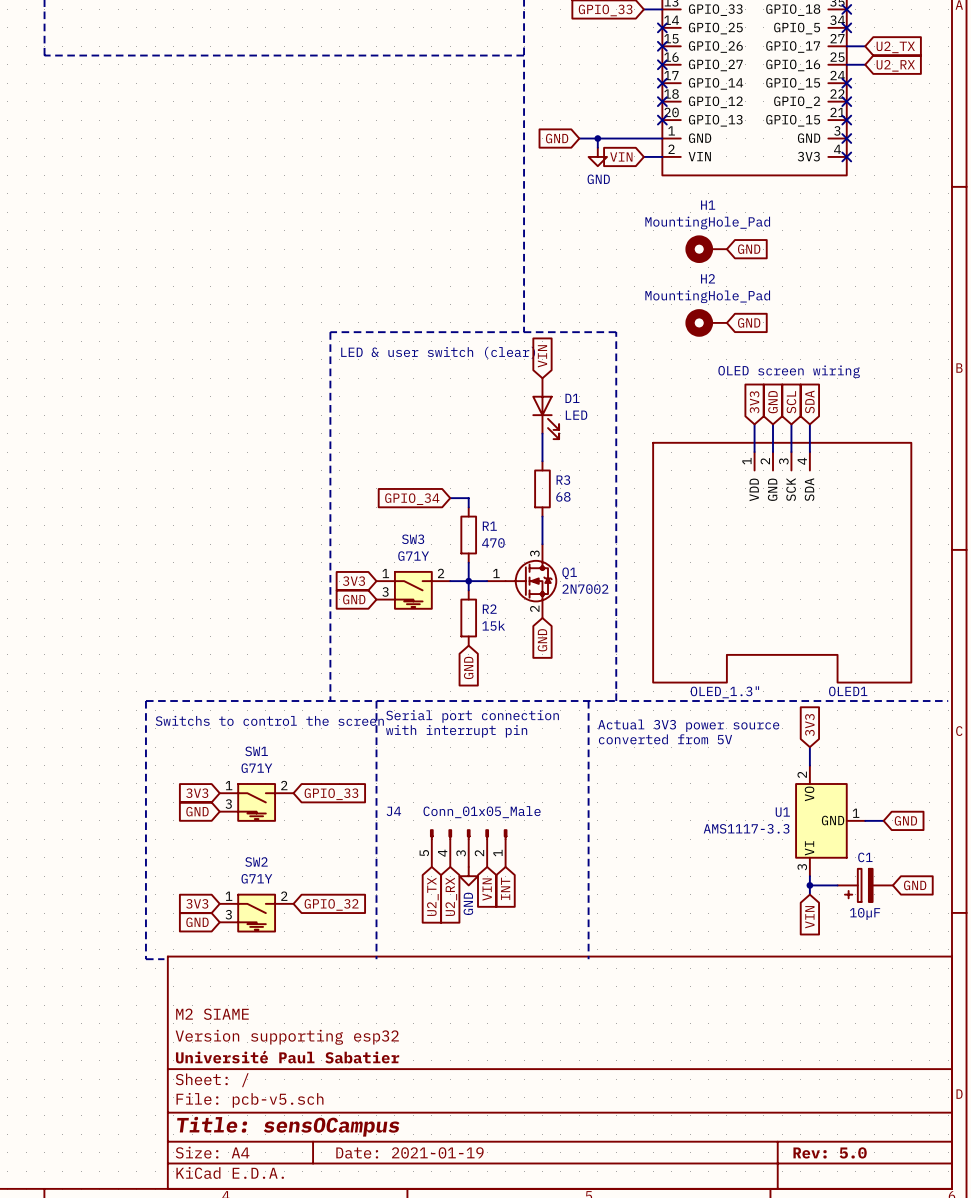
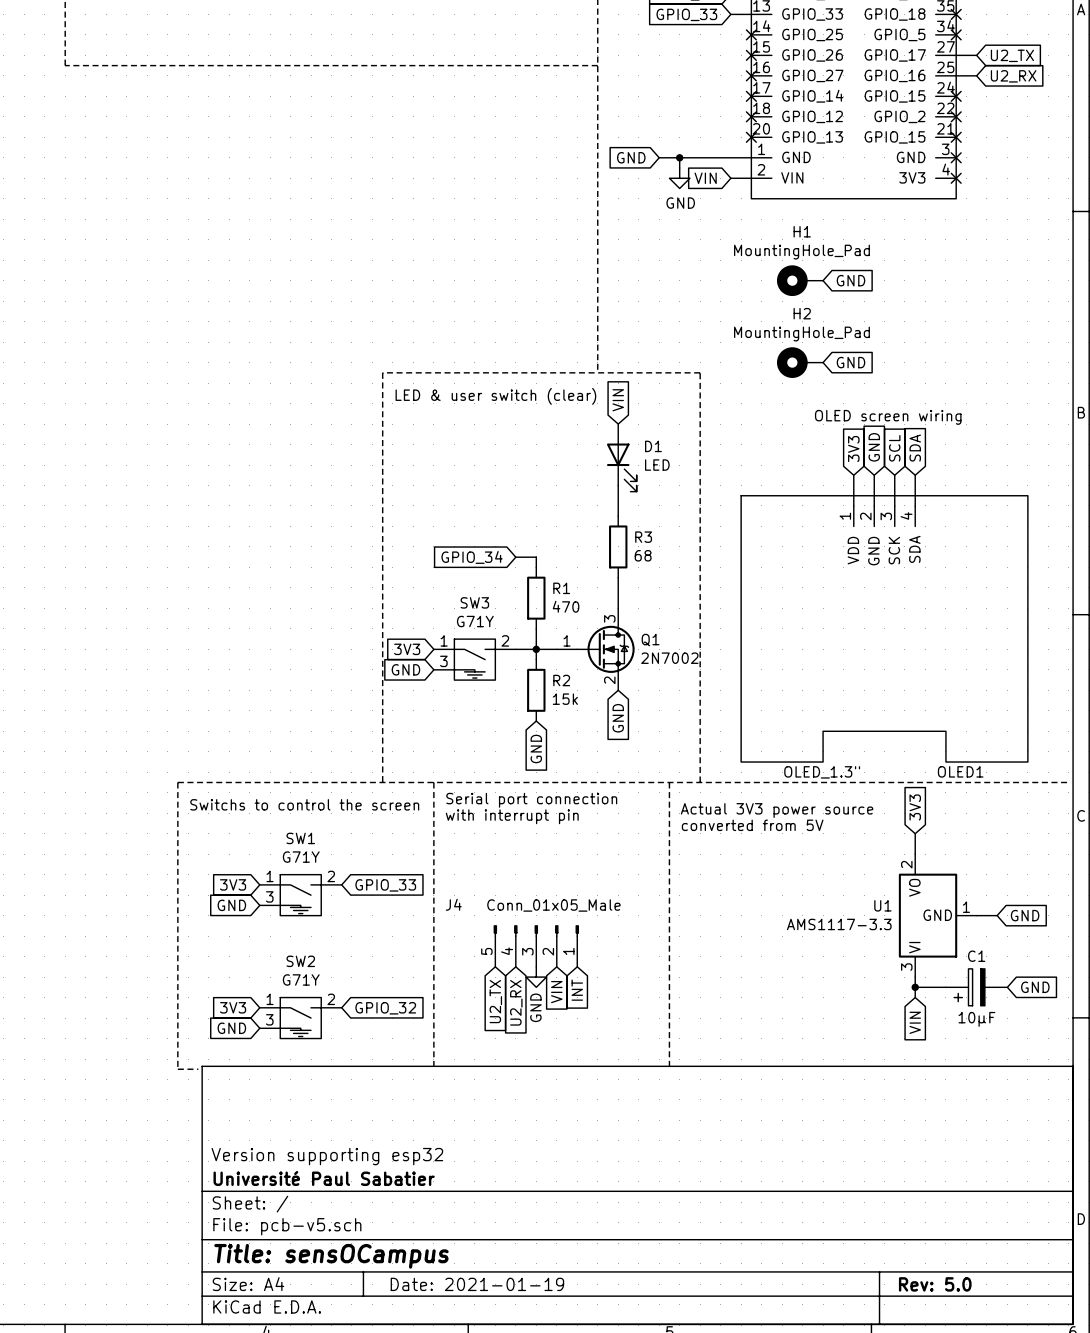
title block: M2 SIAME (212, 1014) -> none

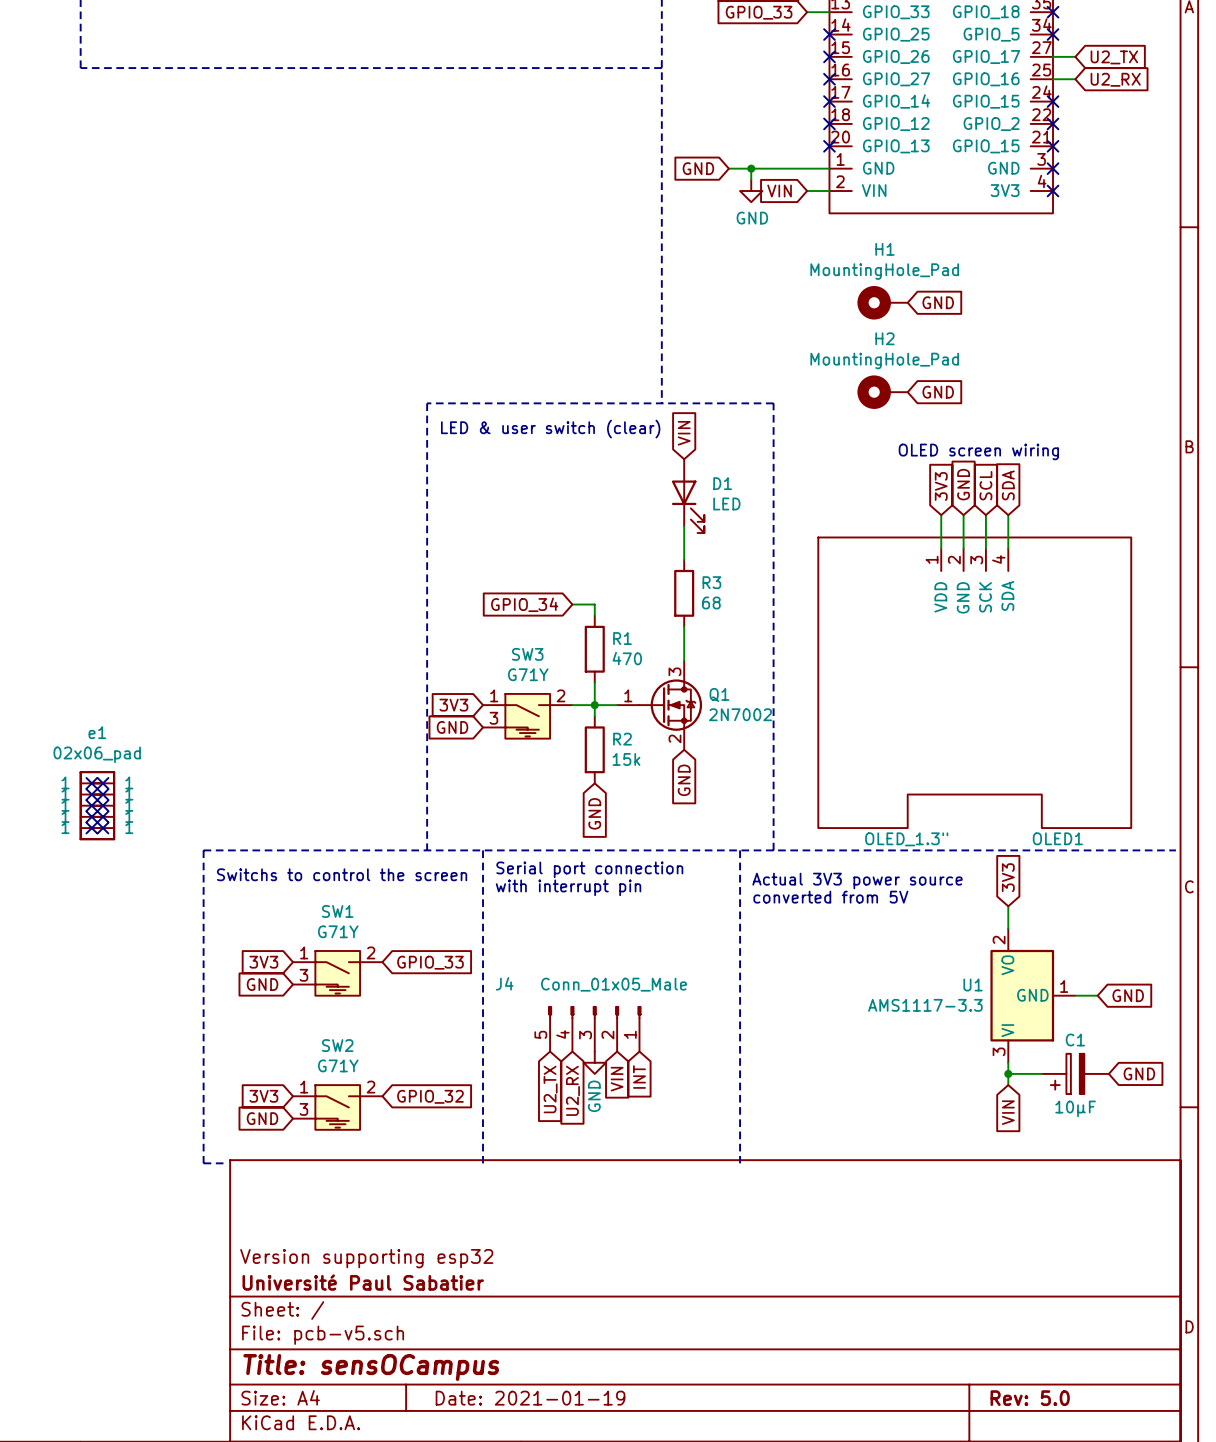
no-connect mark: none -> (91, 783)
no-connect mark: none -> (103, 783)
no-connect mark: none -> (91, 794)
no-connect mark: none -> (103, 794)
no-connect mark: none -> (91, 805)
e1: none -> 02x06_pad (97, 805)
no-connect mark: none -> (103, 805)
no-connect mark: none -> (91, 816)
no-connect mark: none -> (103, 816)
no-connect mark: none -> (91, 828)
no-connect mark: none -> (103, 828)

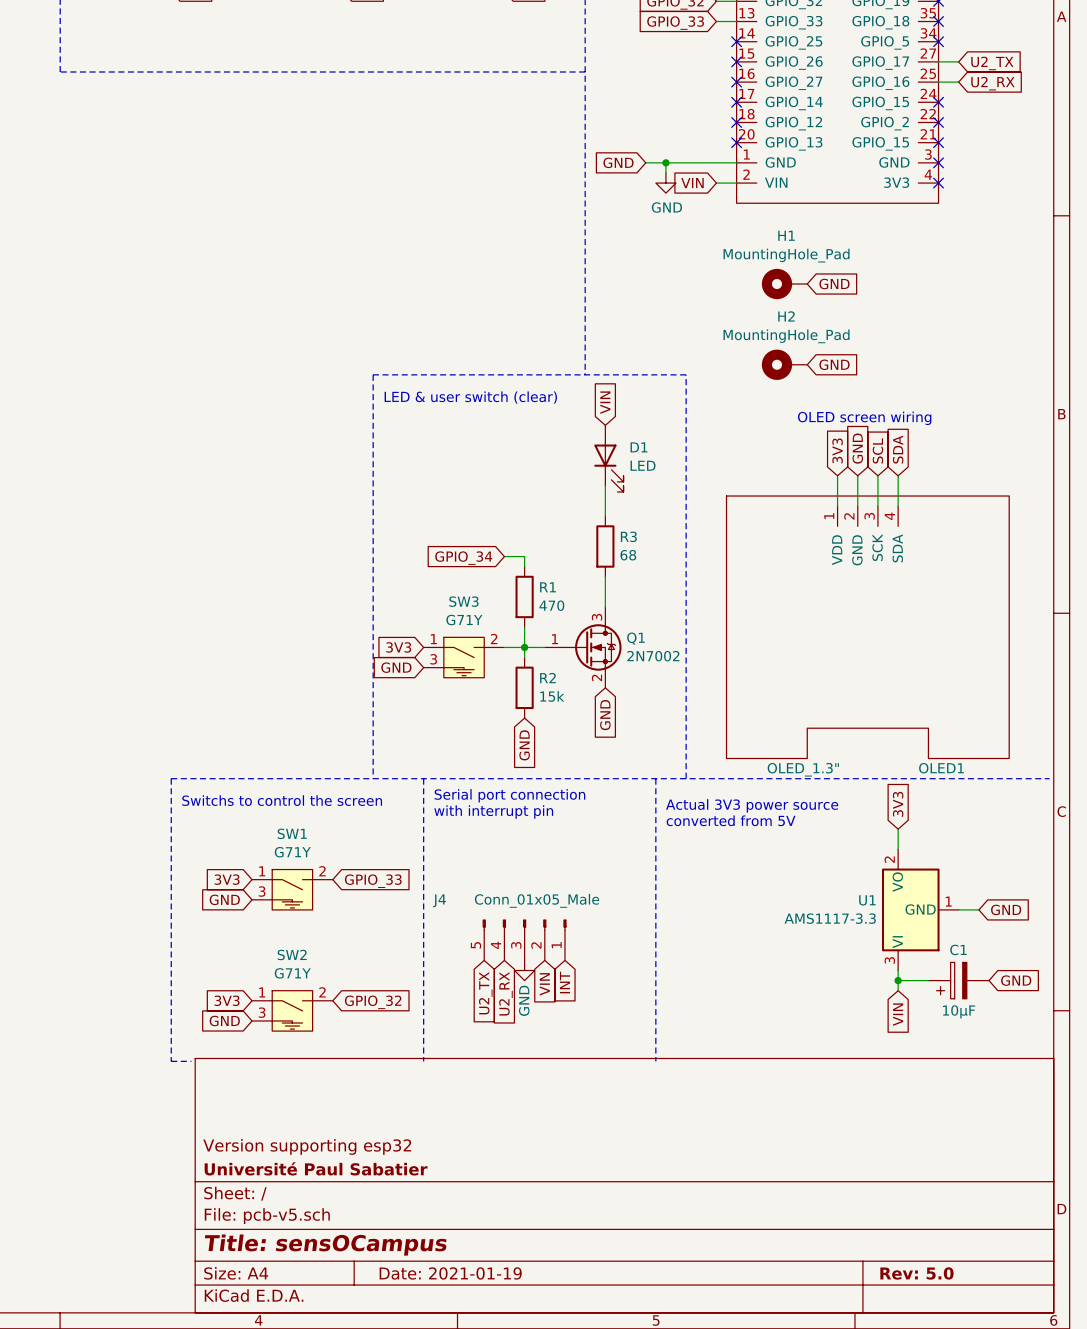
no-connect mark: (91, 783) -> none
no-connect mark: (103, 783) -> none
no-connect mark: (91, 794) -> none
no-connect mark: (103, 794) -> none
no-connect mark: (91, 805) -> none
e1: 02x06_pad (97, 805) -> none
no-connect mark: (103, 805) -> none
no-connect mark: (91, 816) -> none
no-connect mark: (103, 816) -> none
no-connect mark: (91, 828) -> none
no-connect mark: (103, 828) -> none

